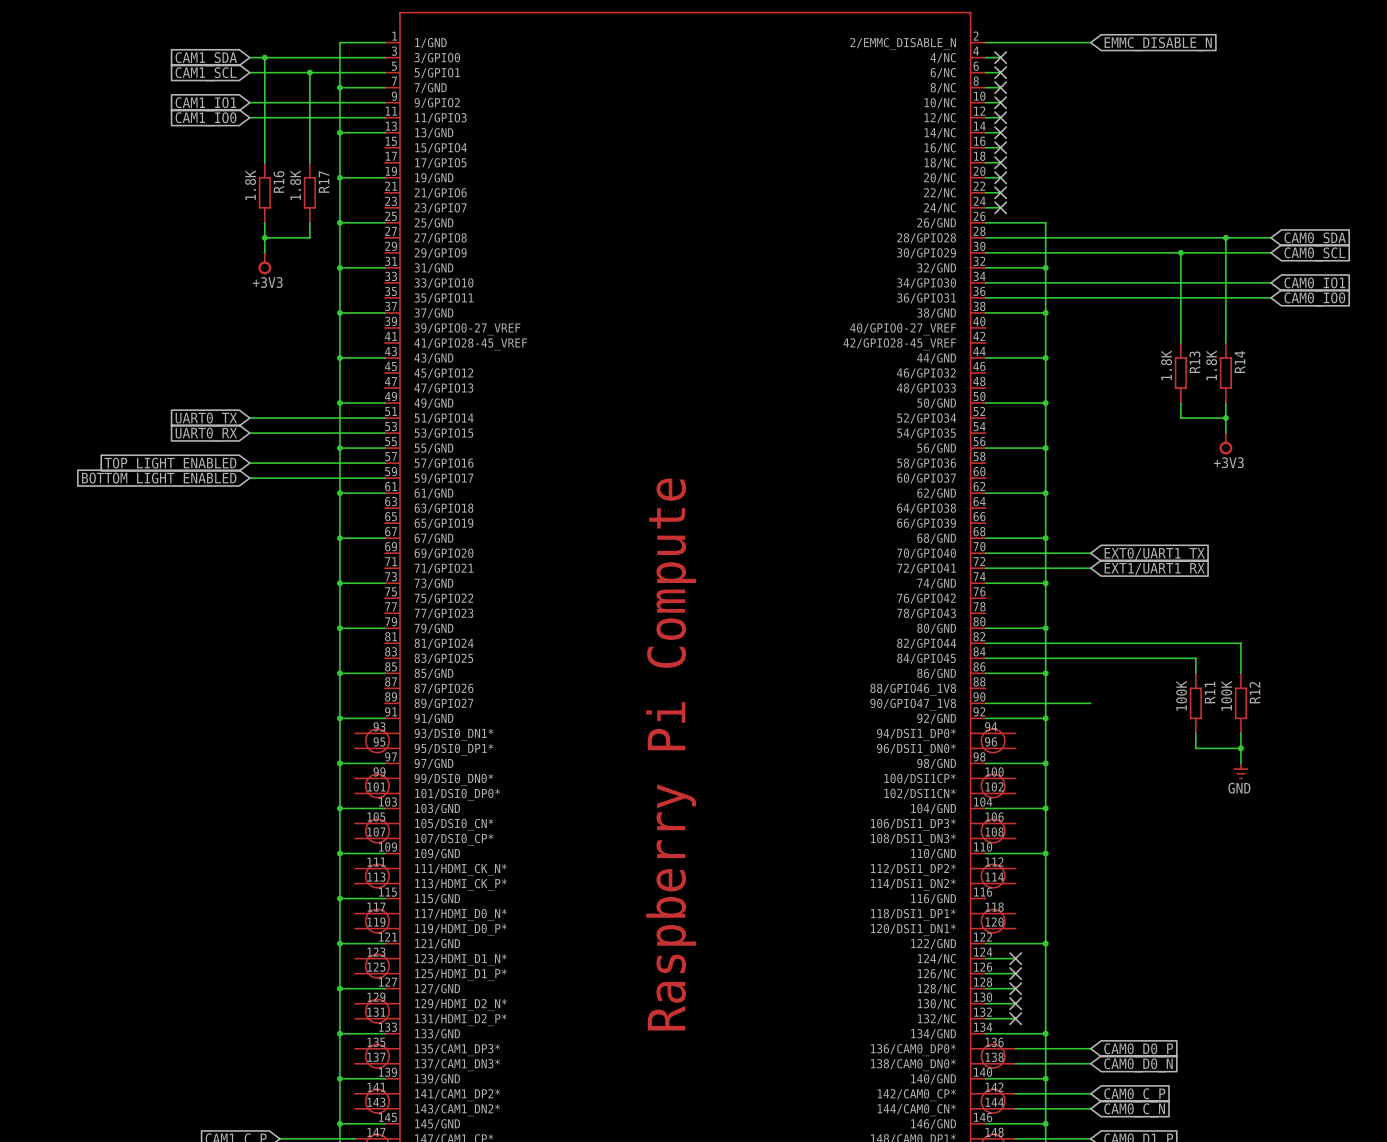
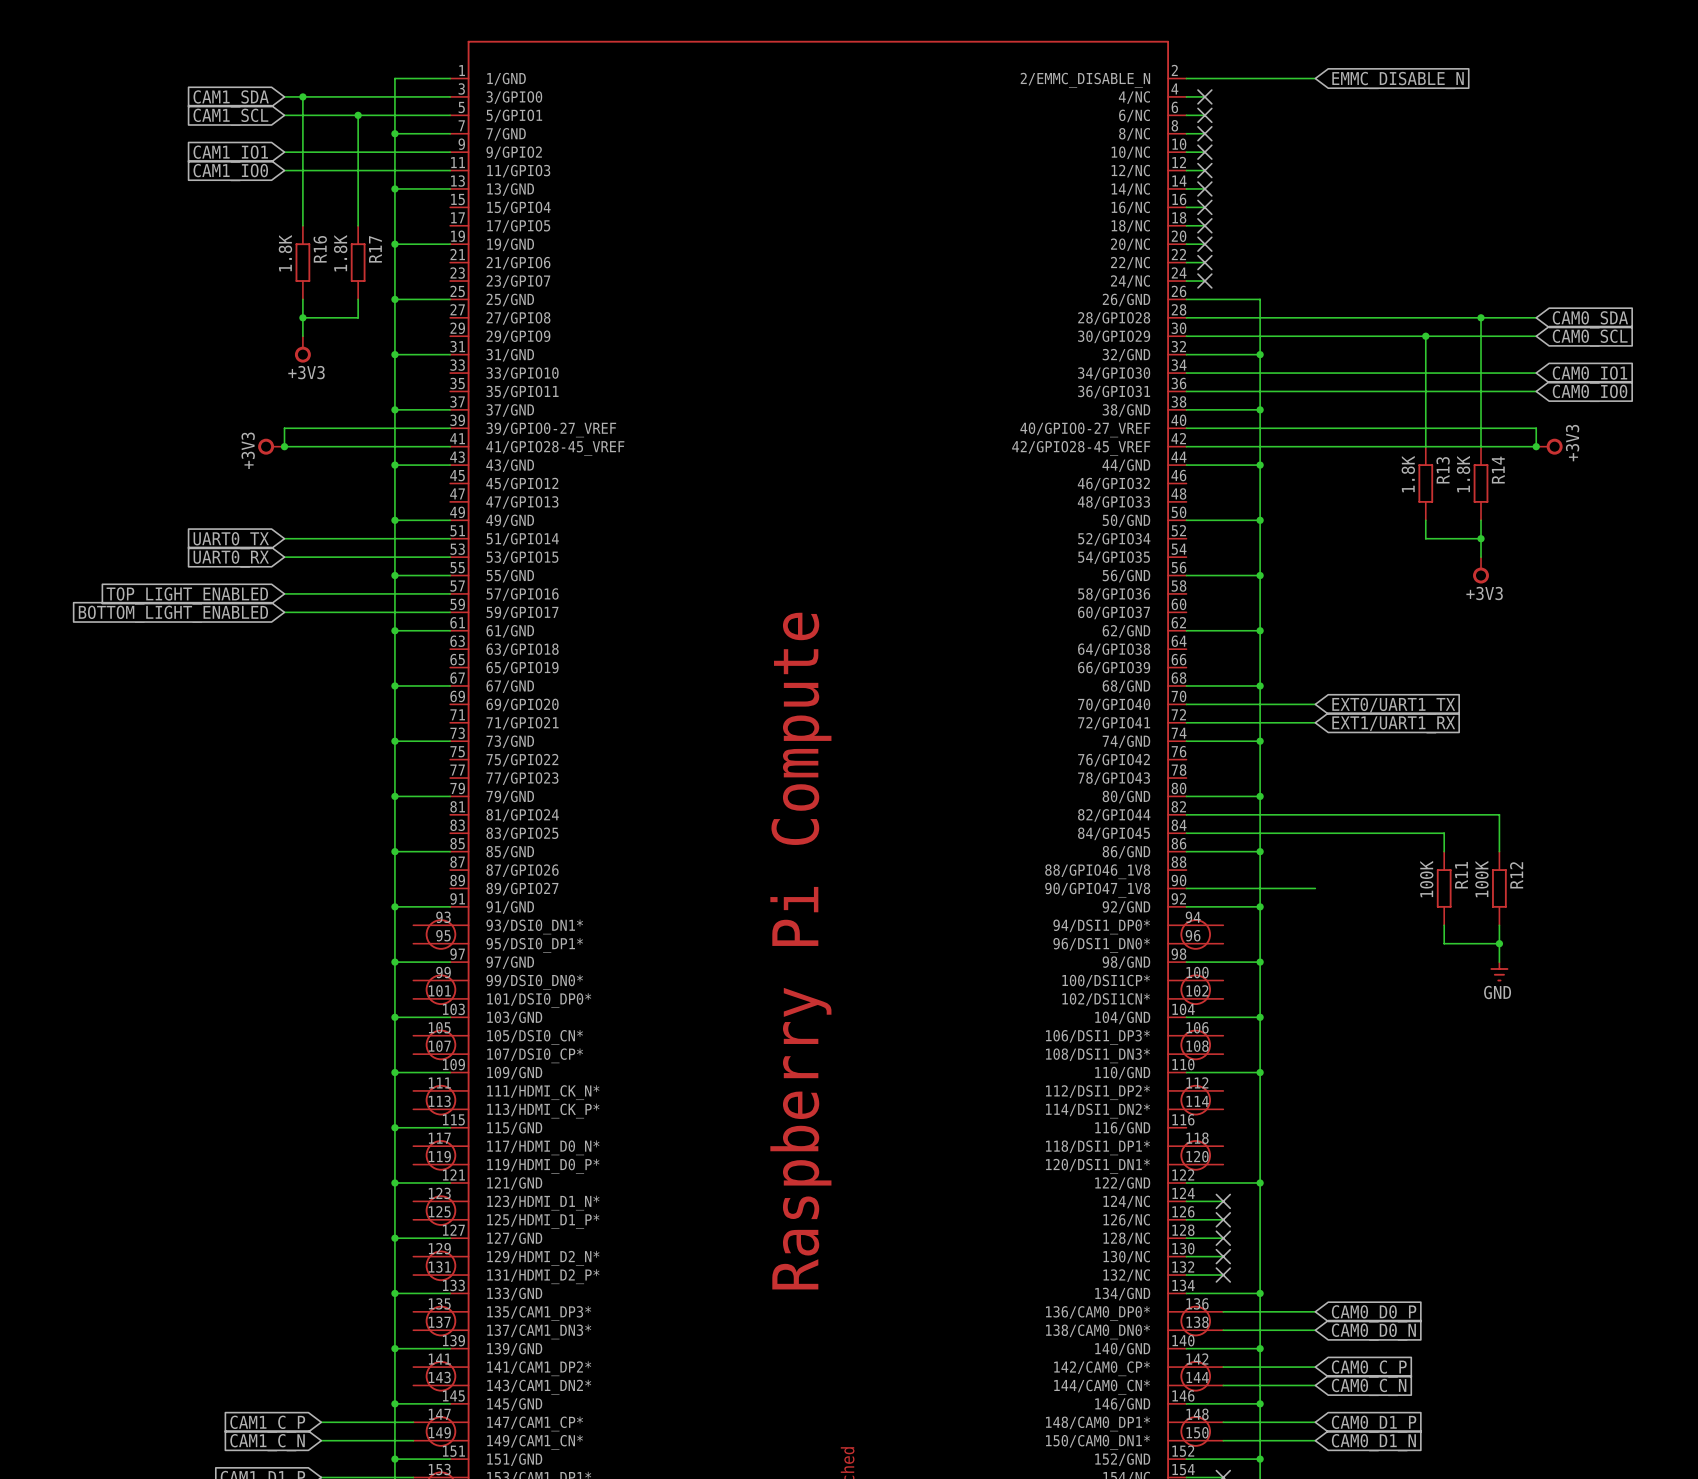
wire: none -> (450, 428) (284, 428) (284, 446) (450, 446)
wire: none -> (1186, 428) (1536, 428) (1536, 446) (1186, 446)
power symbol: none -> +3V3 (271, 446)
junction: none -> (284, 446)
junction: none -> (1536, 446)
power symbol: none -> +3V3 (1549, 446)

